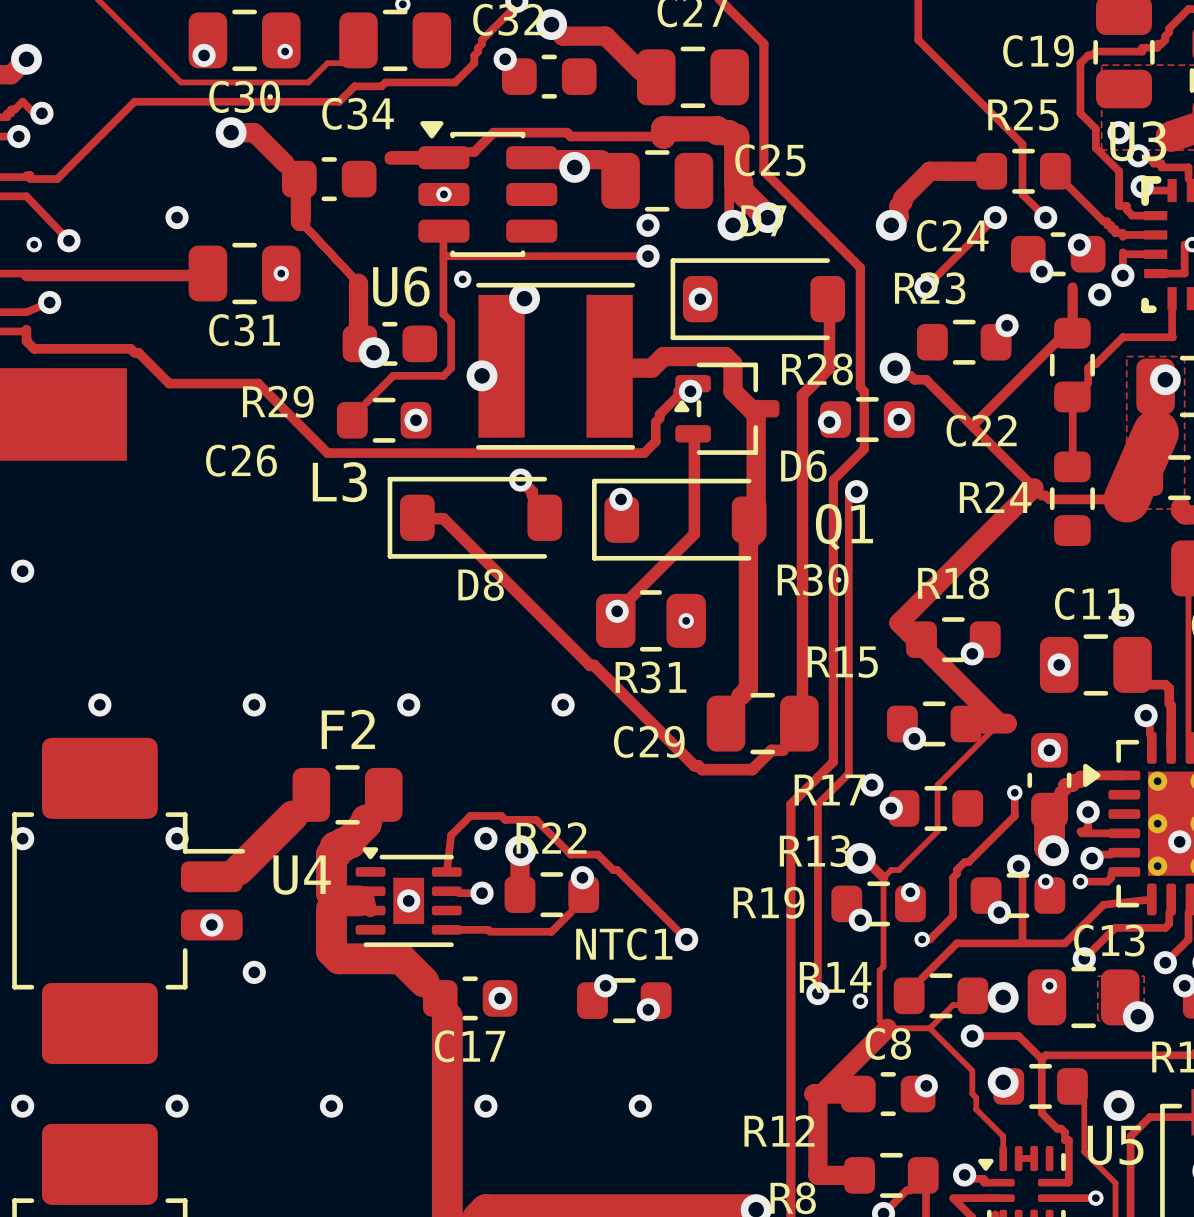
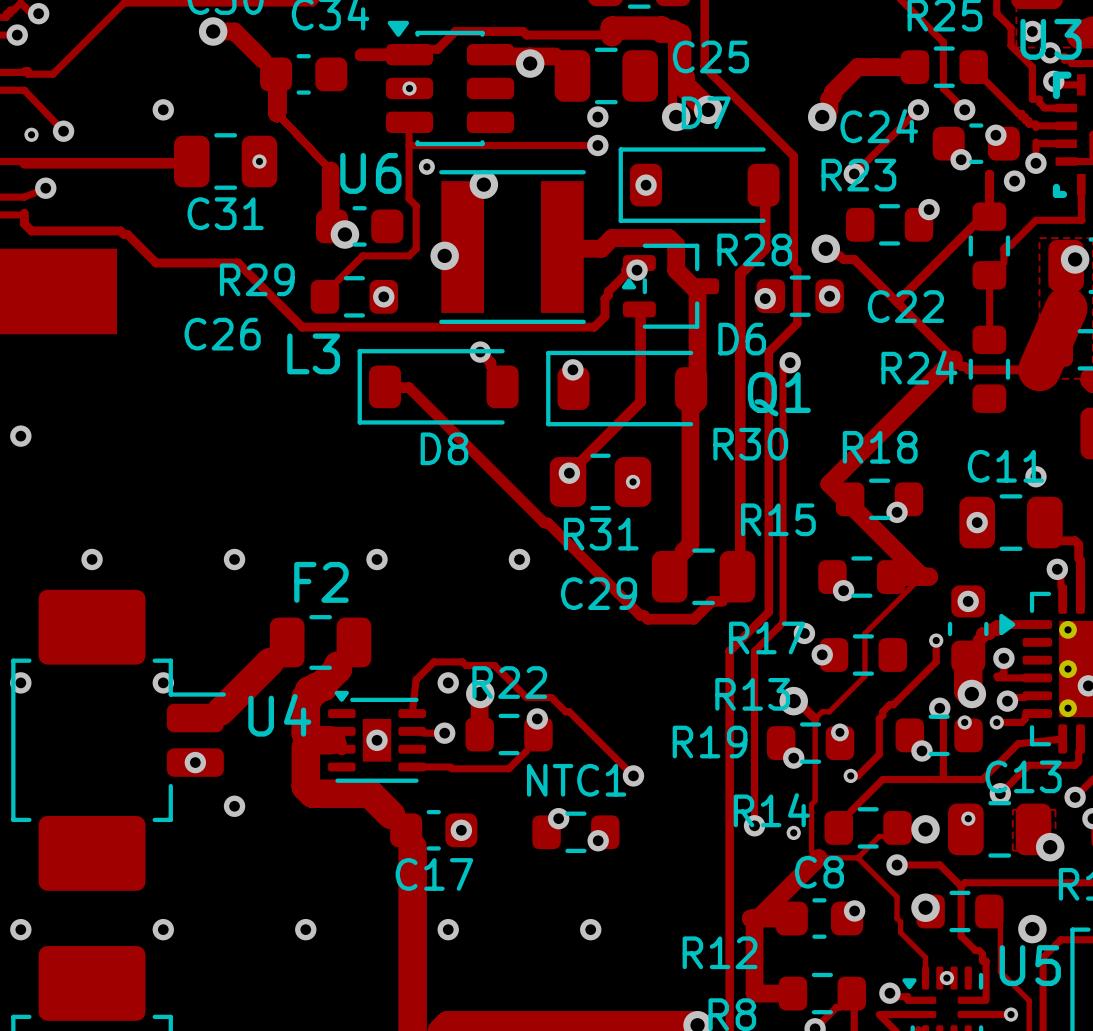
via: none -> (946, 978)

